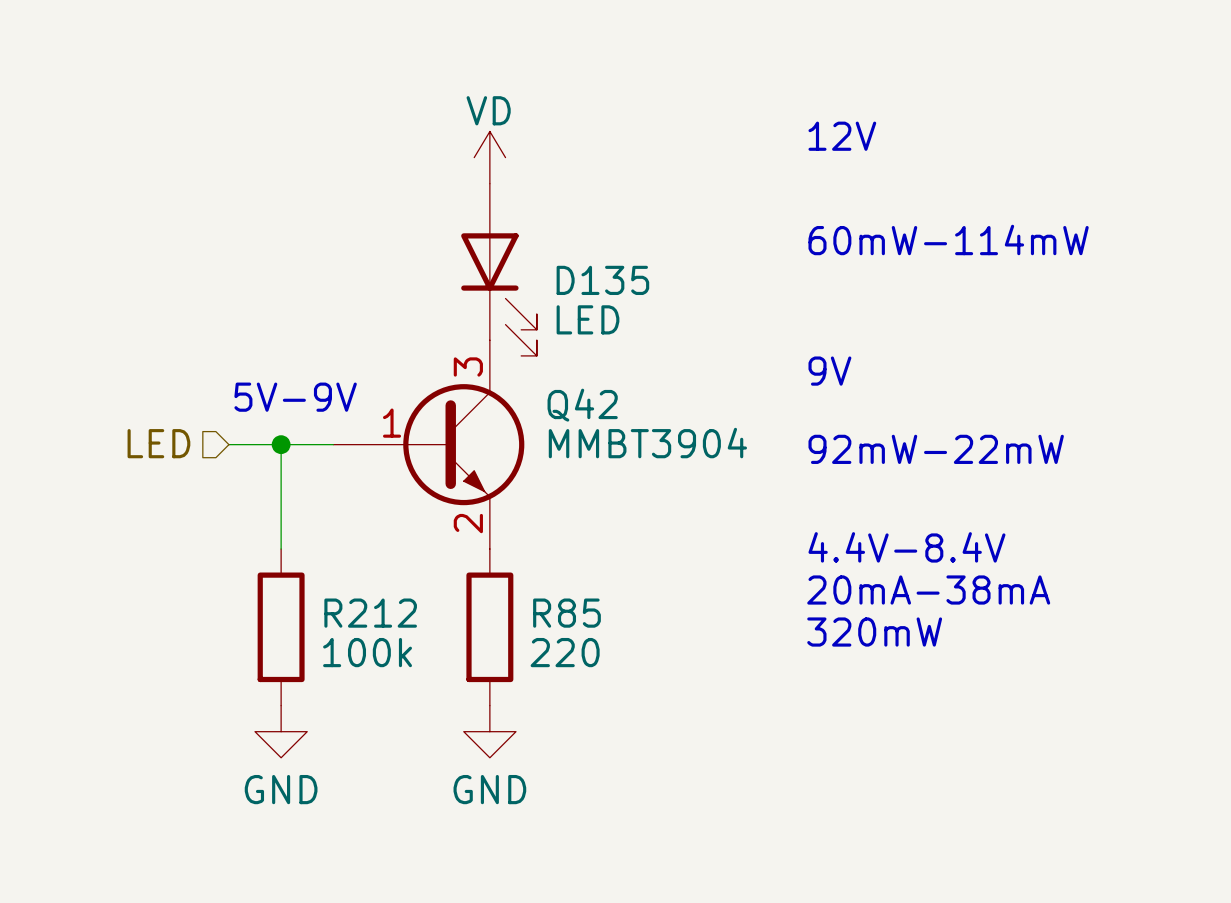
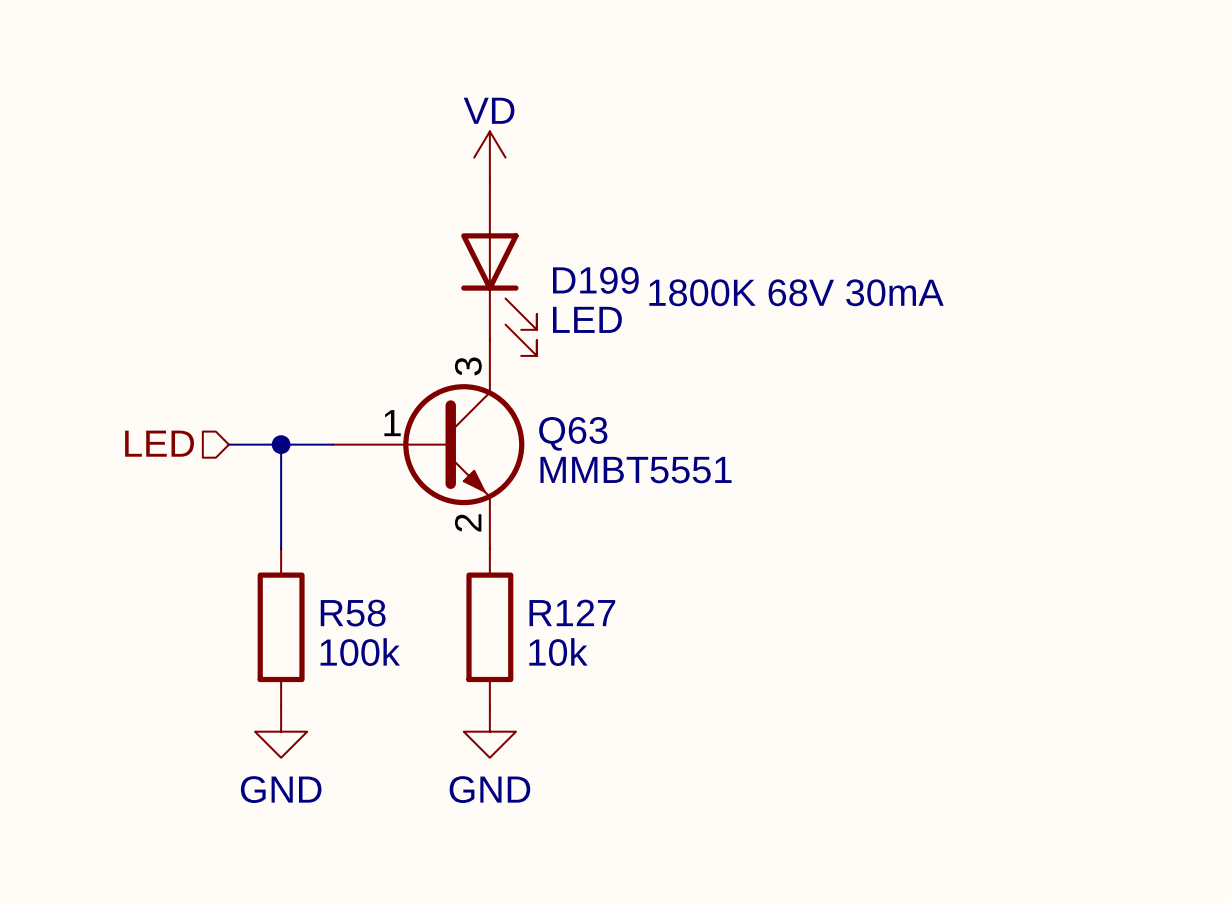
text: 12V (842, 136) -> none
text: 60mW-114mW (948, 239) -> none
D135 name: D135 (602, 280) -> D199 (595, 280)
text: none -> 1800K 68V 30mA (796, 292)
text: 9V (829, 371) -> none
text: 5V-9V (295, 397) -> none
Q42 name: Q42 (582, 405) -> Q63 (573, 433)
Q42 value: MMBT3904 (647, 443) -> MMBT5551 (636, 470)
text: 92mW-22mW (936, 449) -> none
text: 4.4V-8.4V (906, 547) -> none
text: 20mA-38mA (928, 590) -> none
R212 name: R212 (370, 613) -> R58 (353, 613)
R85 name: R85 (566, 613) -> R127 (572, 612)
text: 320mW (874, 632) -> none
R85 value: 220 (565, 652) -> 10k (558, 652)

